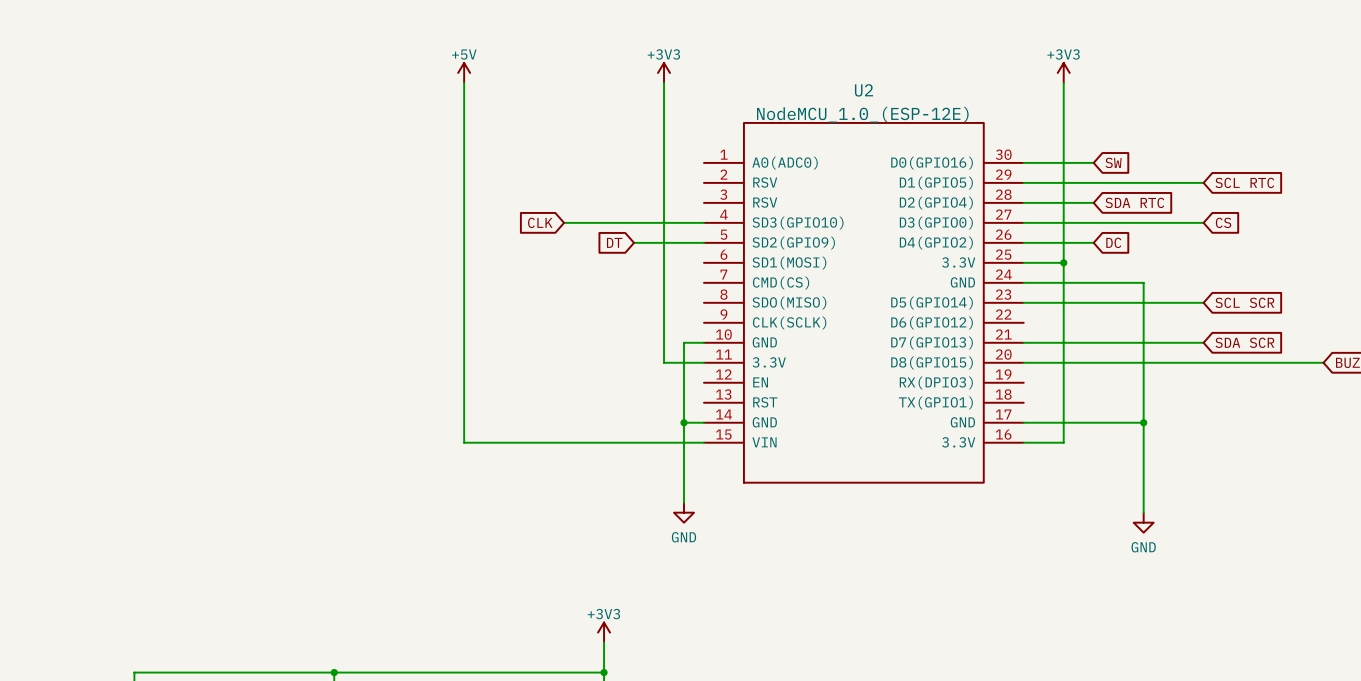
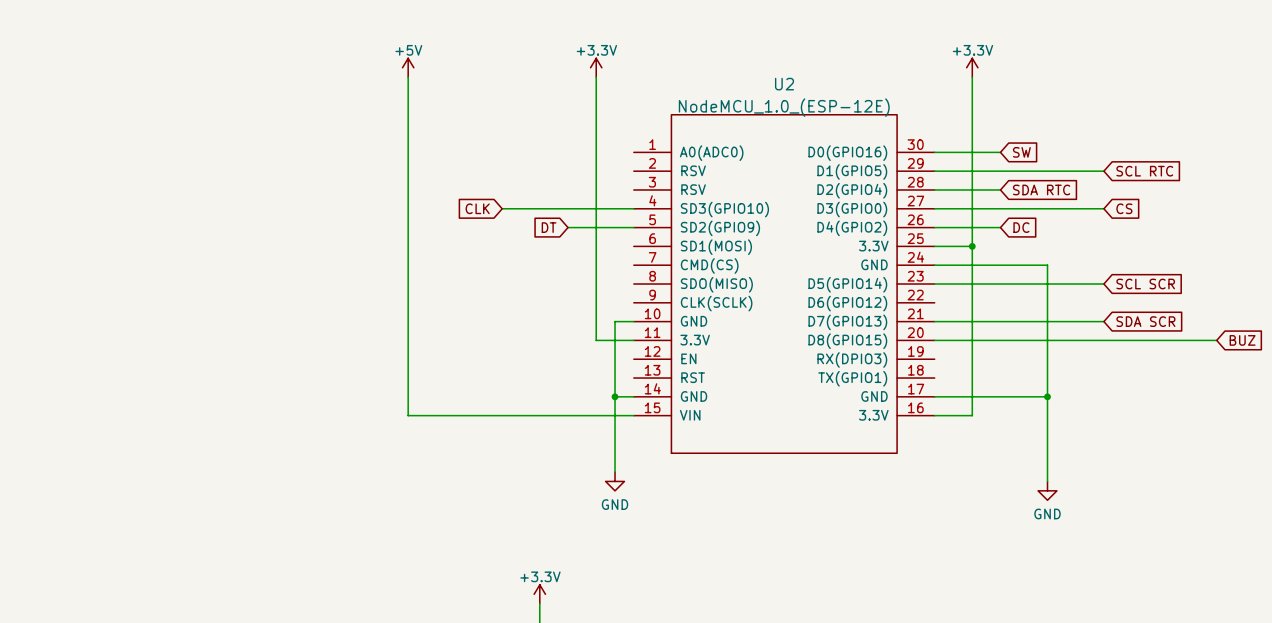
power symbol: +3V3 (664, 72) -> +3.3V (596, 67)
power symbol: +3V3 (1063, 72) -> +3.3V (972, 67)
power symbol: +3V3 (604, 632) -> +3.3V (539, 594)

